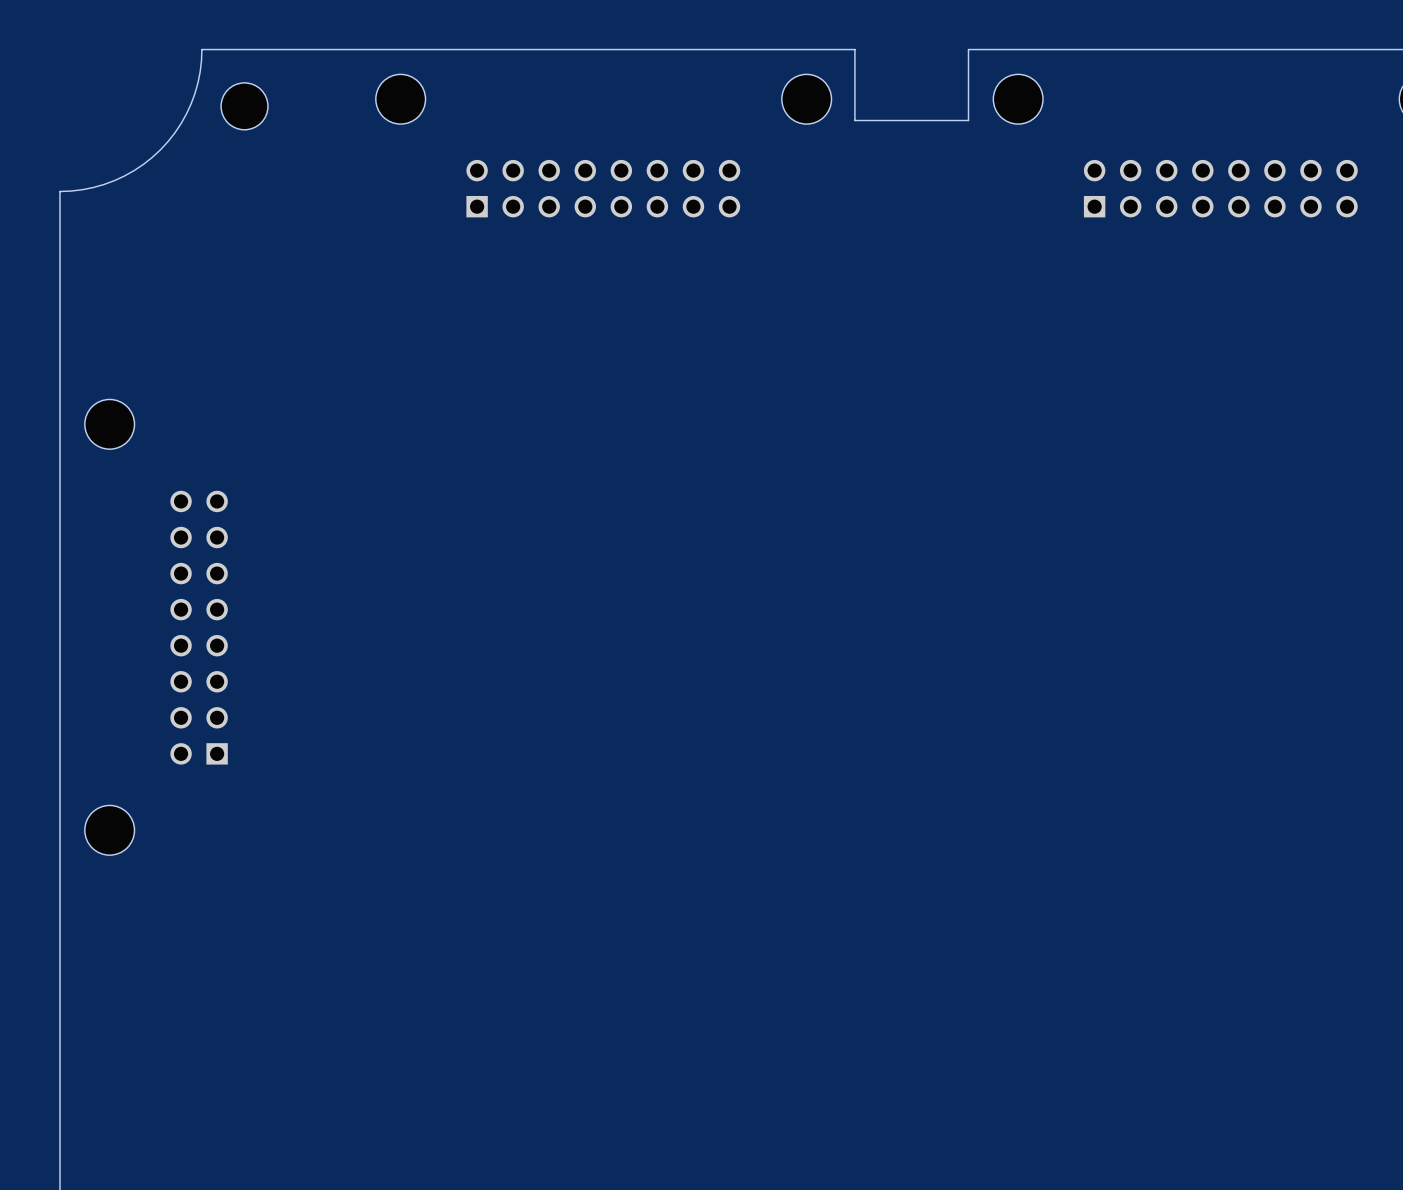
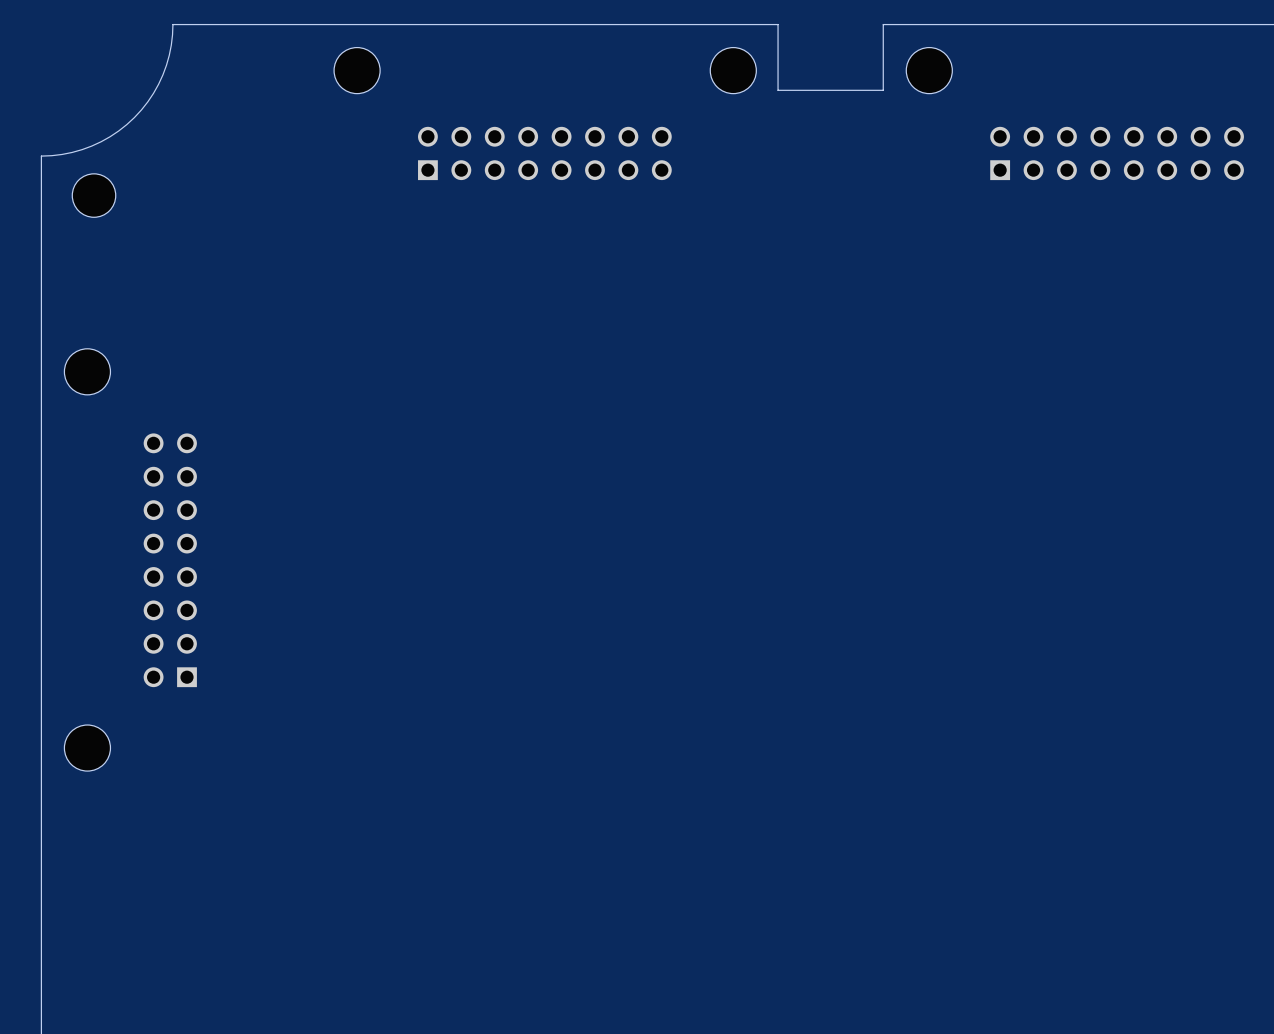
part position: (244, 106) -> (94, 195)

